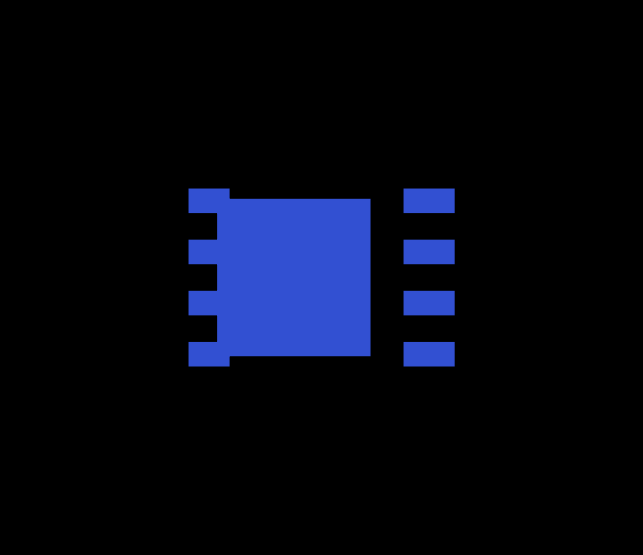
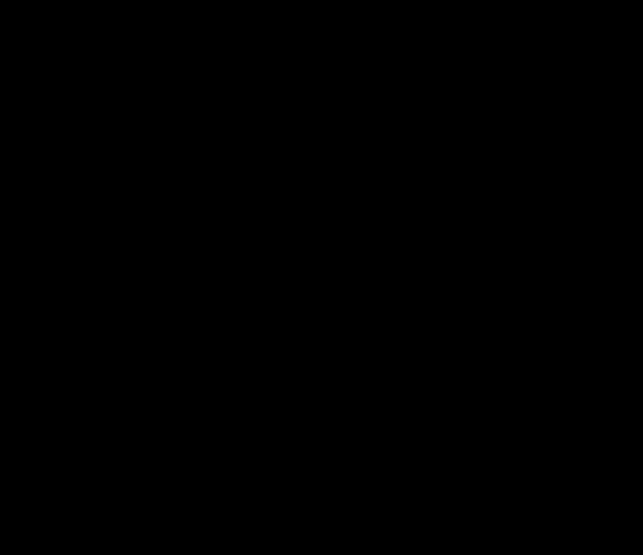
part: (321, 277) -> none

